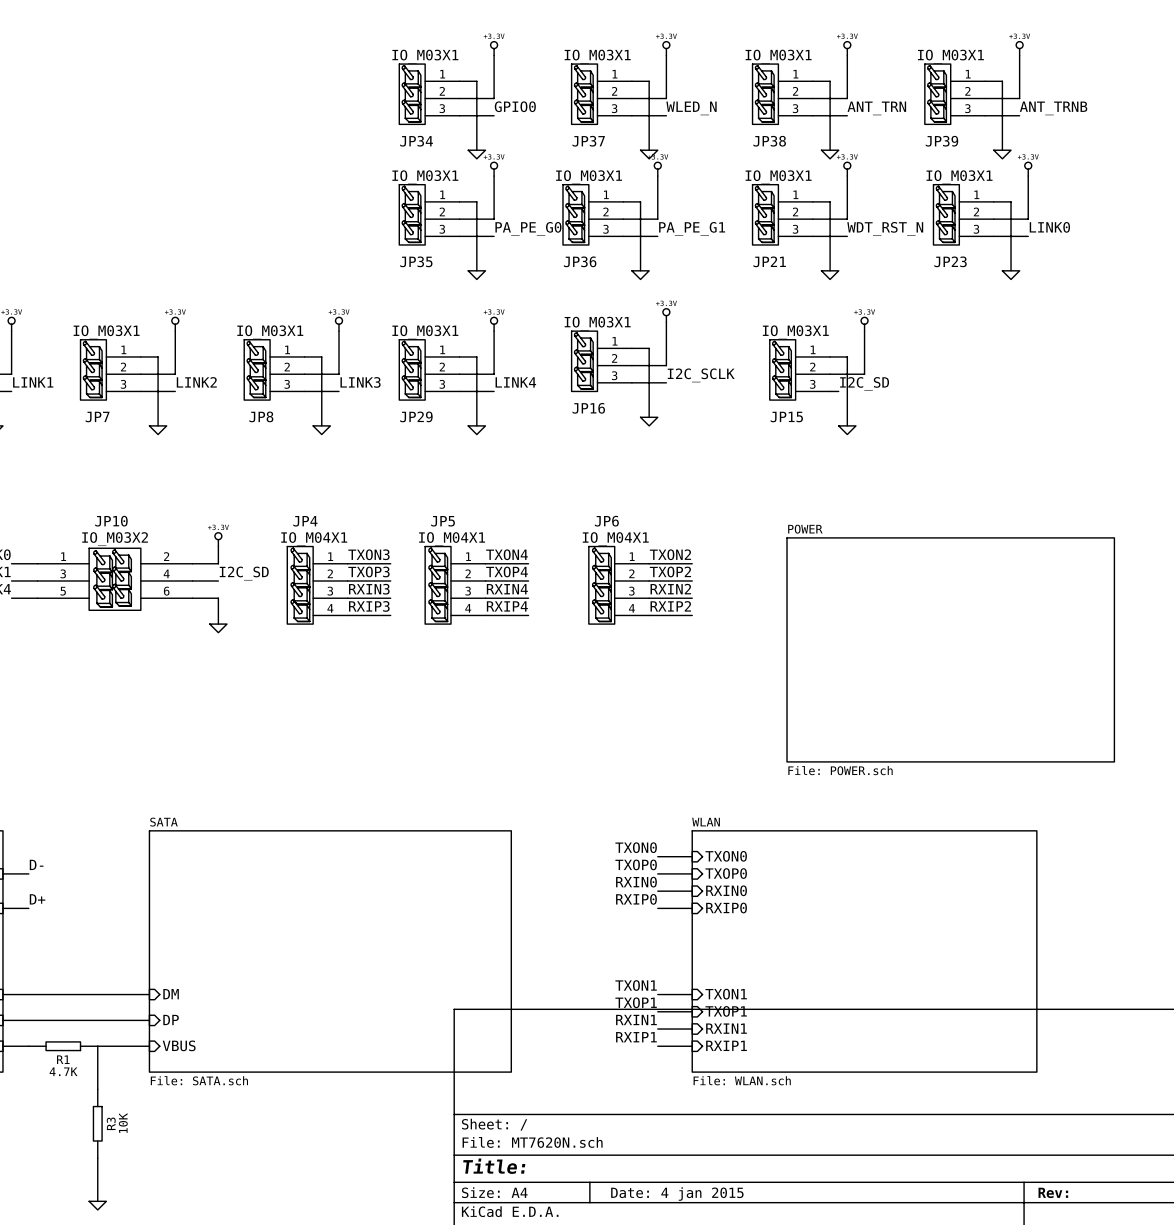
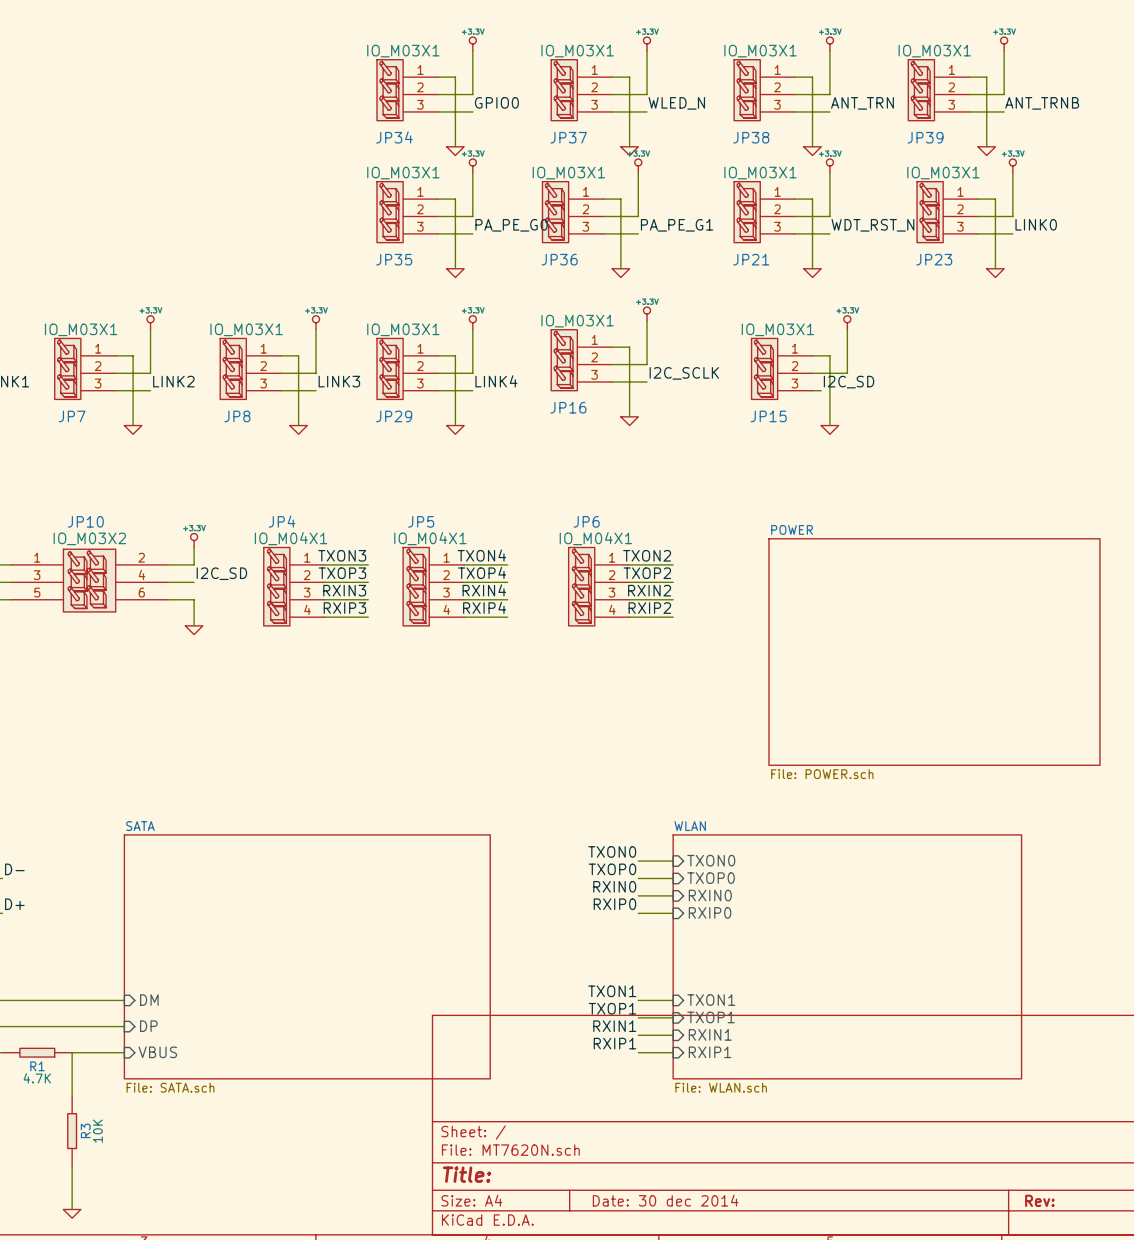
title block: Date: 4 jan 2015 (677, 1194) -> Date: 30 dec 2014 (665, 1200)

